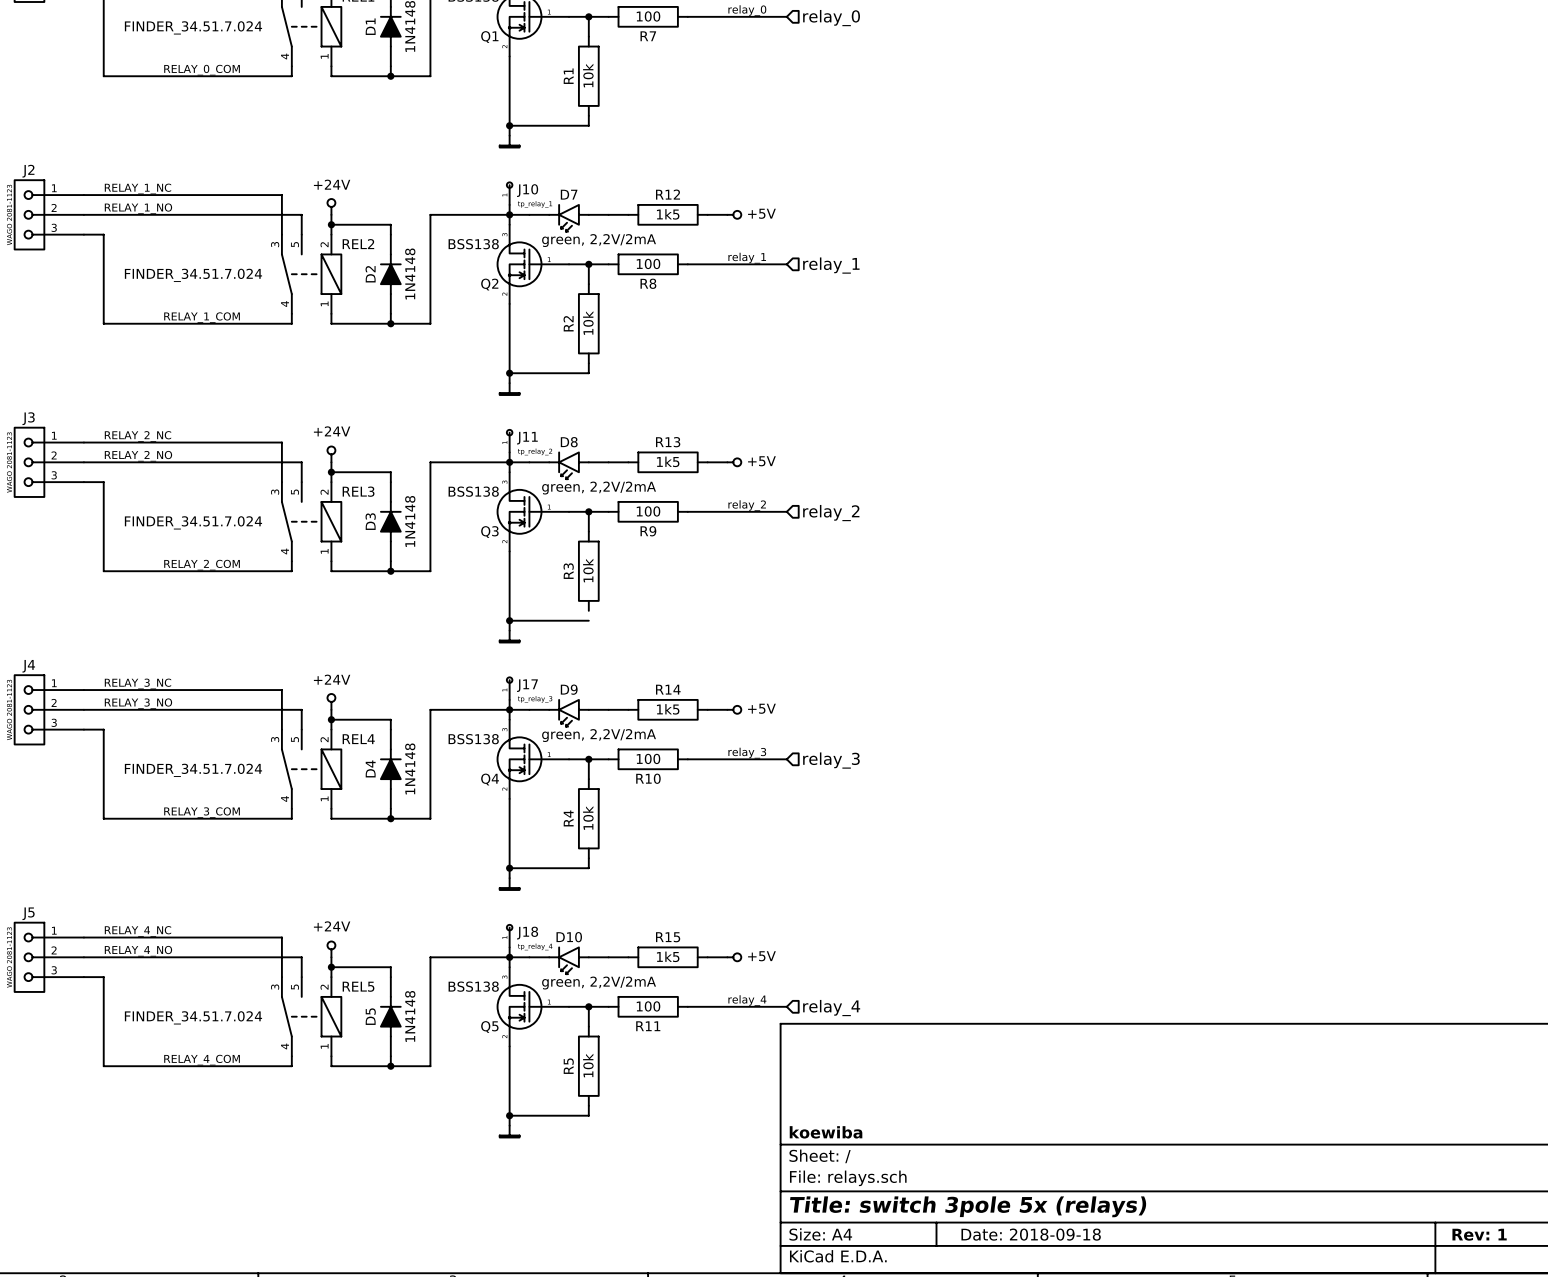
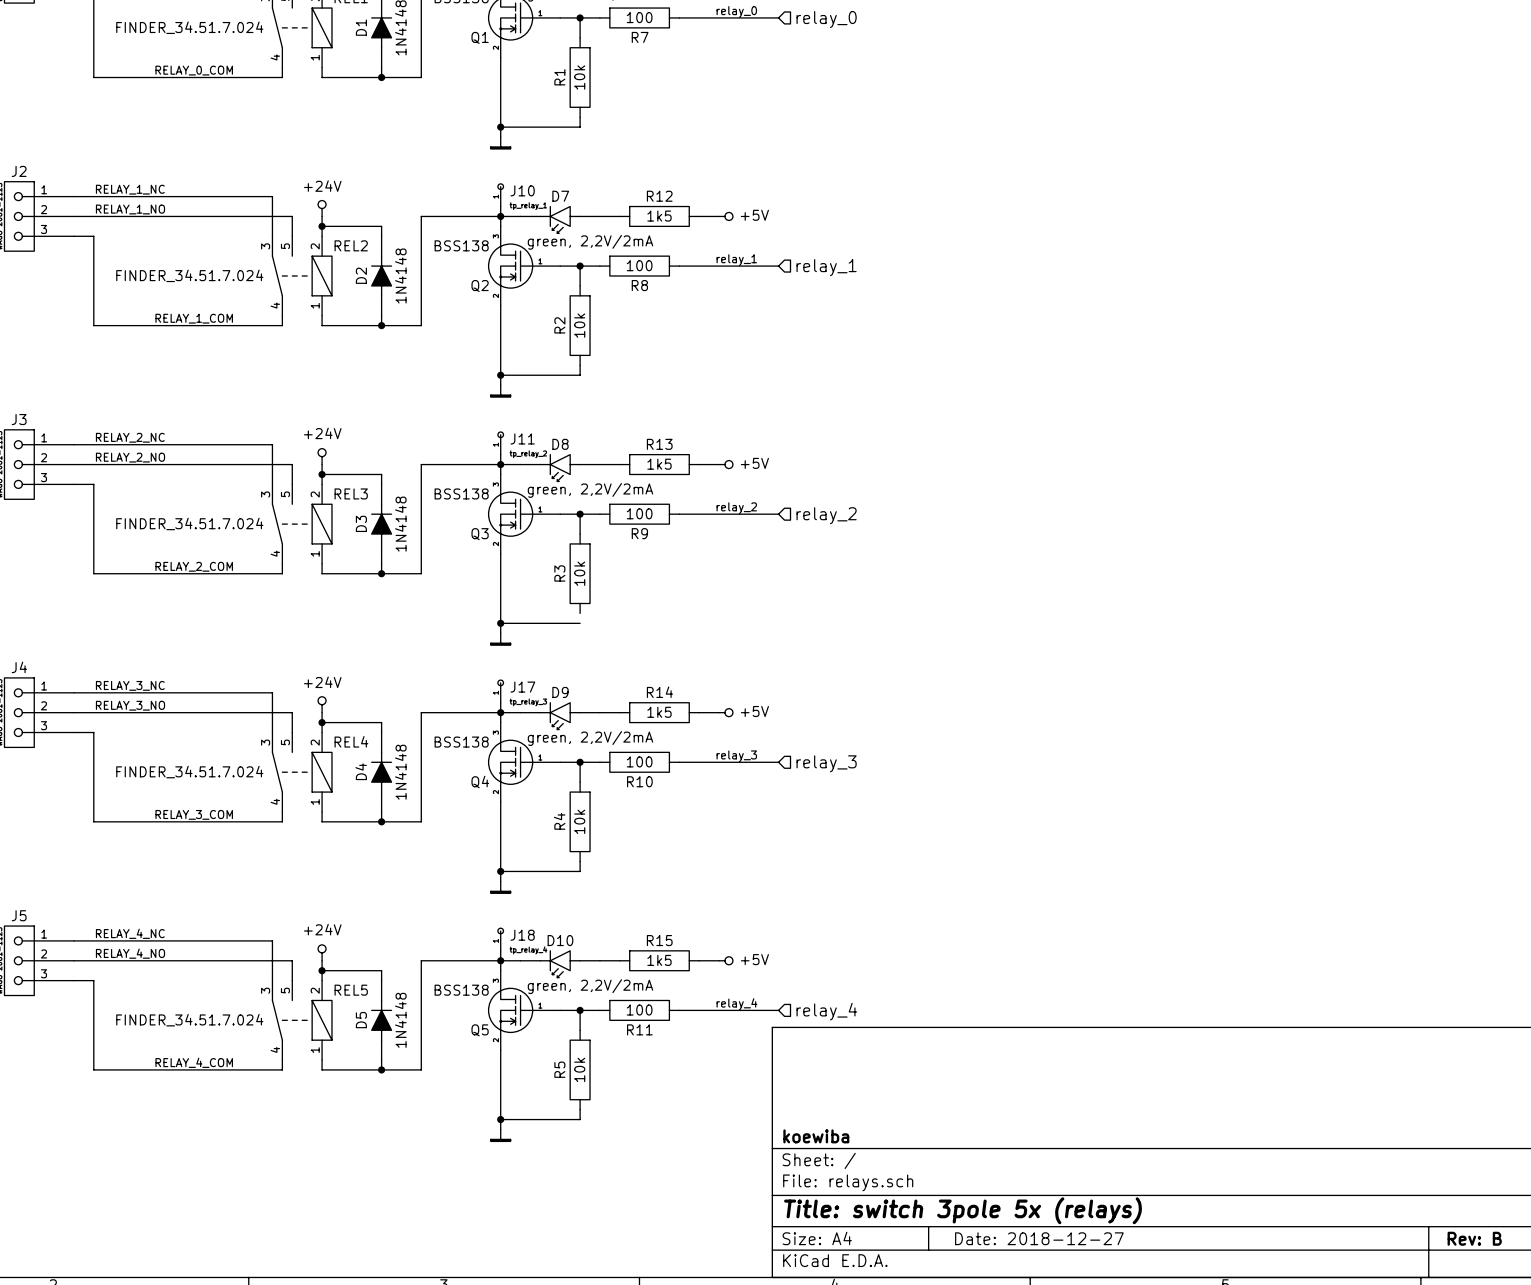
title block: Date: 2018-09-18 (1031, 1234) -> Date: 2018-12-27 (1039, 1238)
title block: Rev: 1 (1479, 1234) -> Rev: B (1474, 1238)

